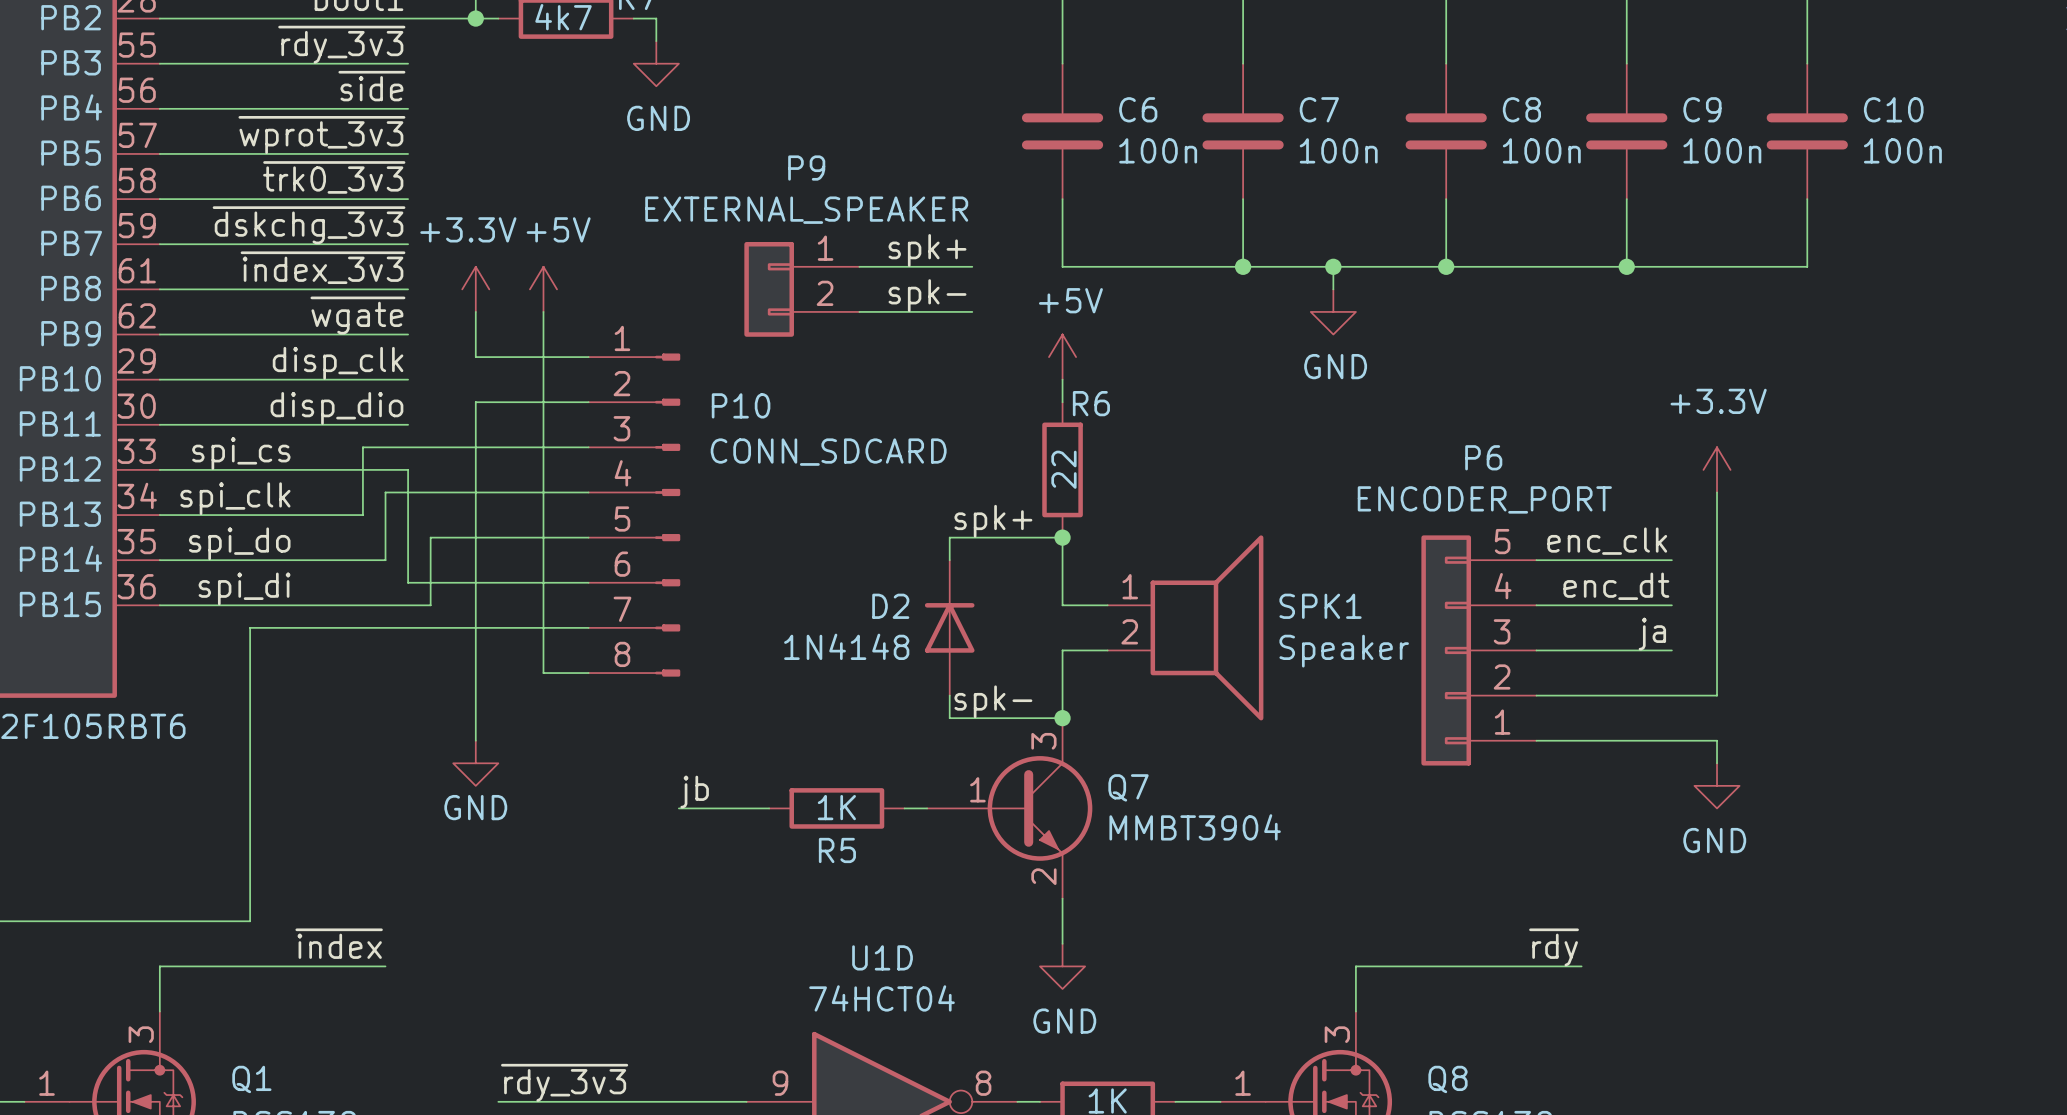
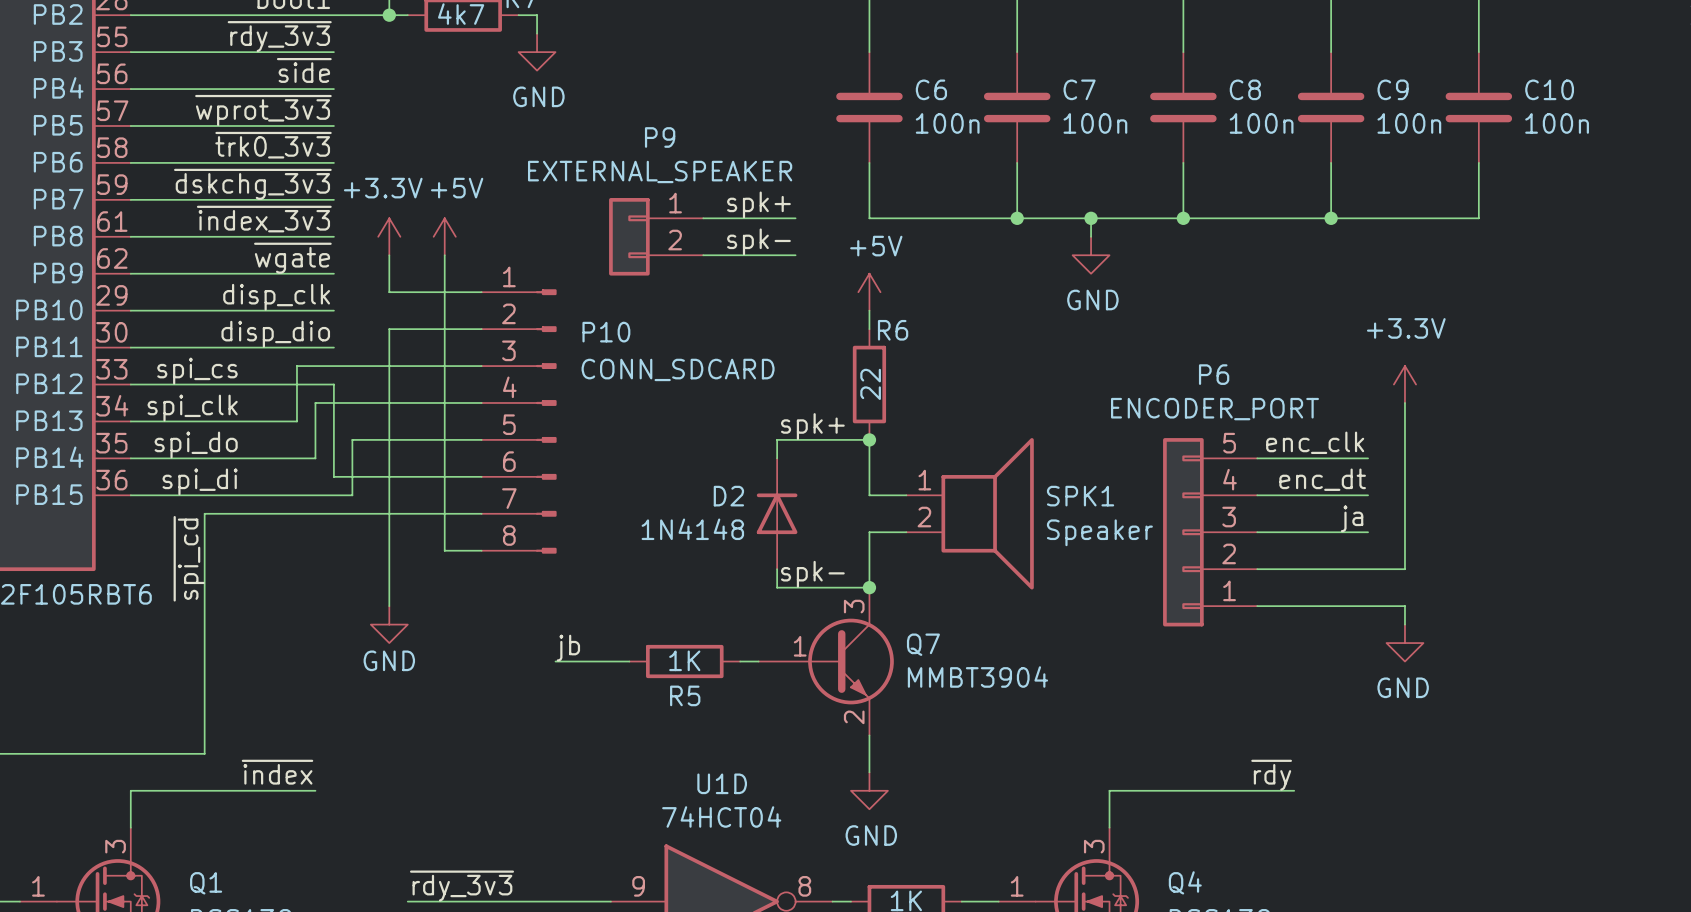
label: none -> ~{spi_cd} (189, 558)
Q8 name: Q8 (1447, 1079) -> Q4 (1185, 882)

